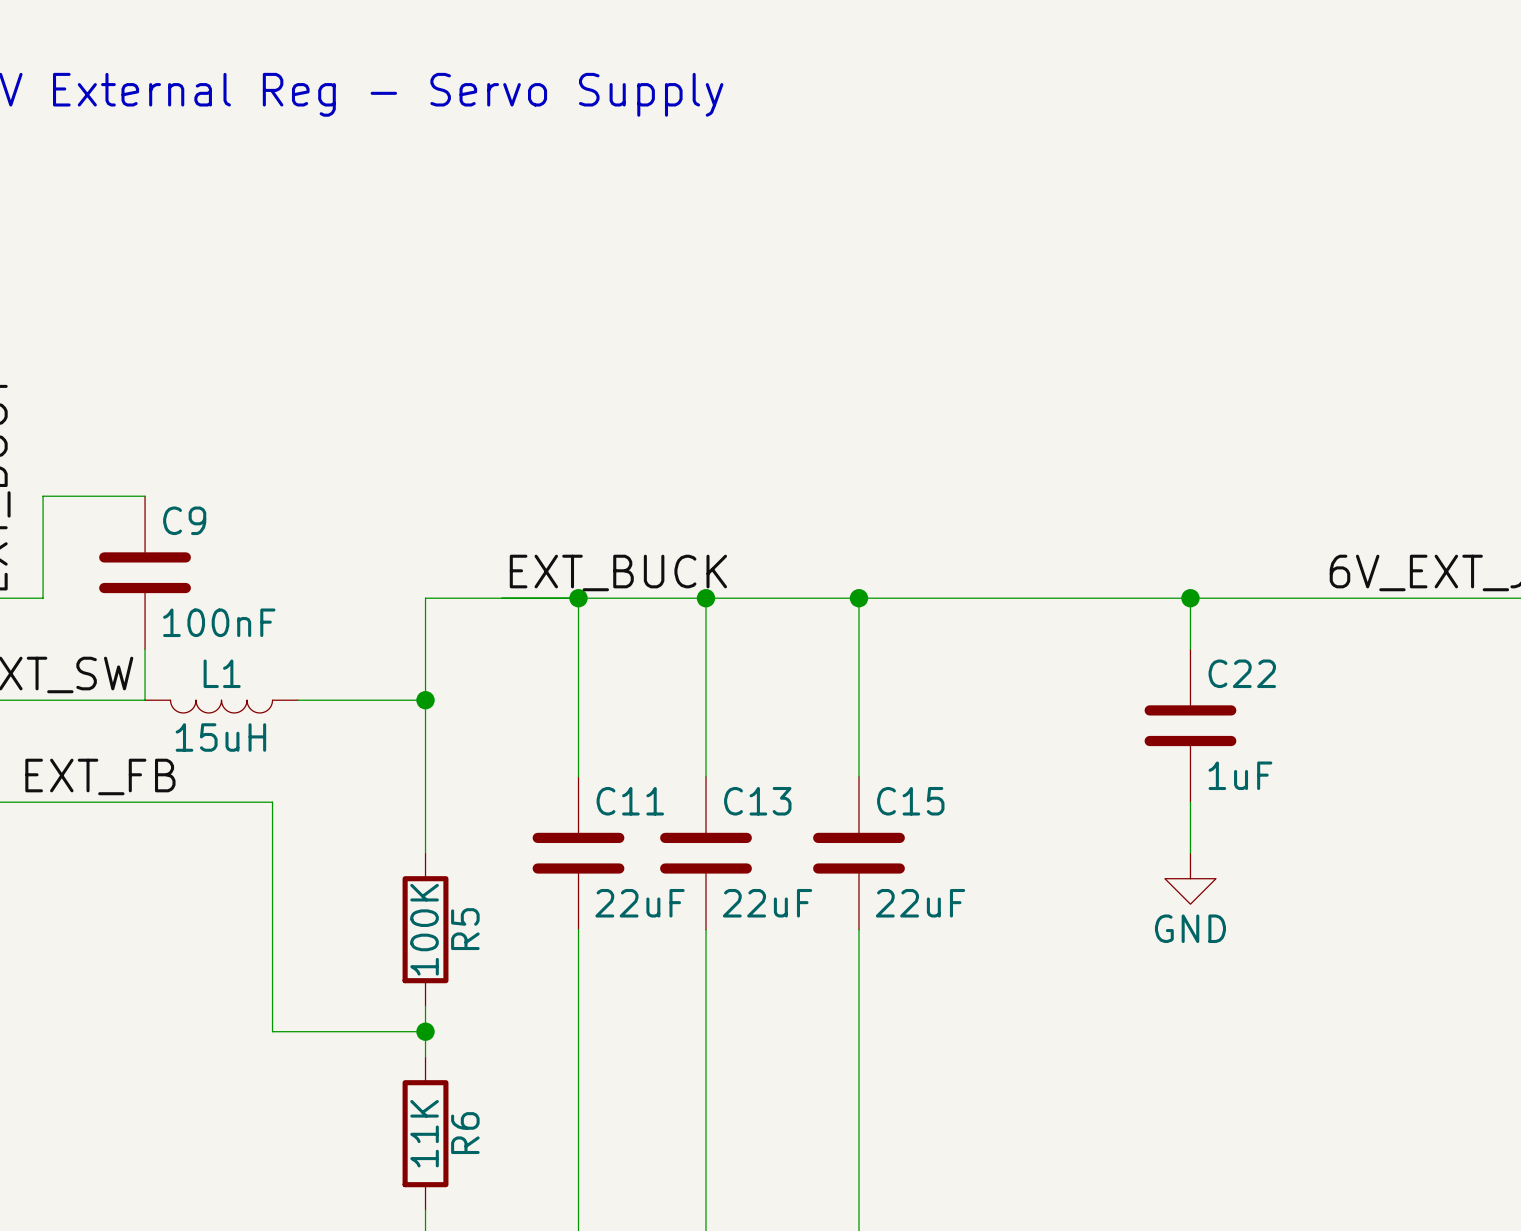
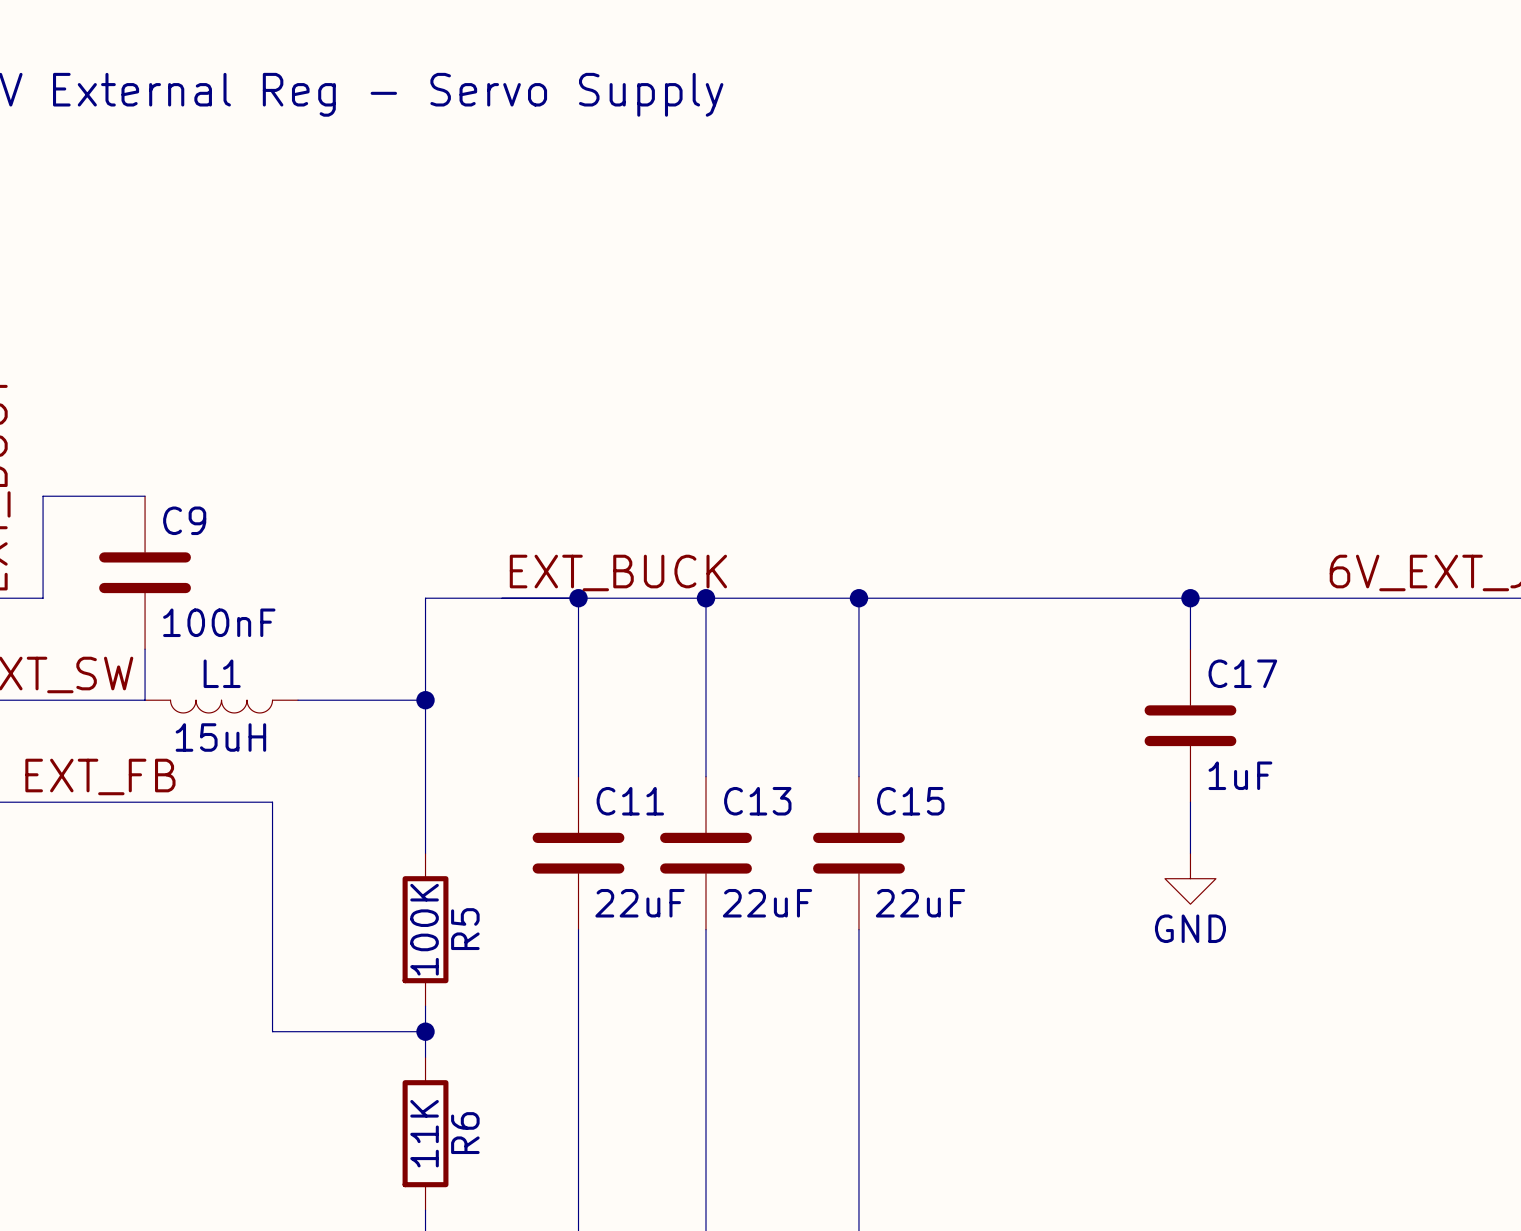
C22 name: C22 (1242, 673) -> C17 (1242, 673)

